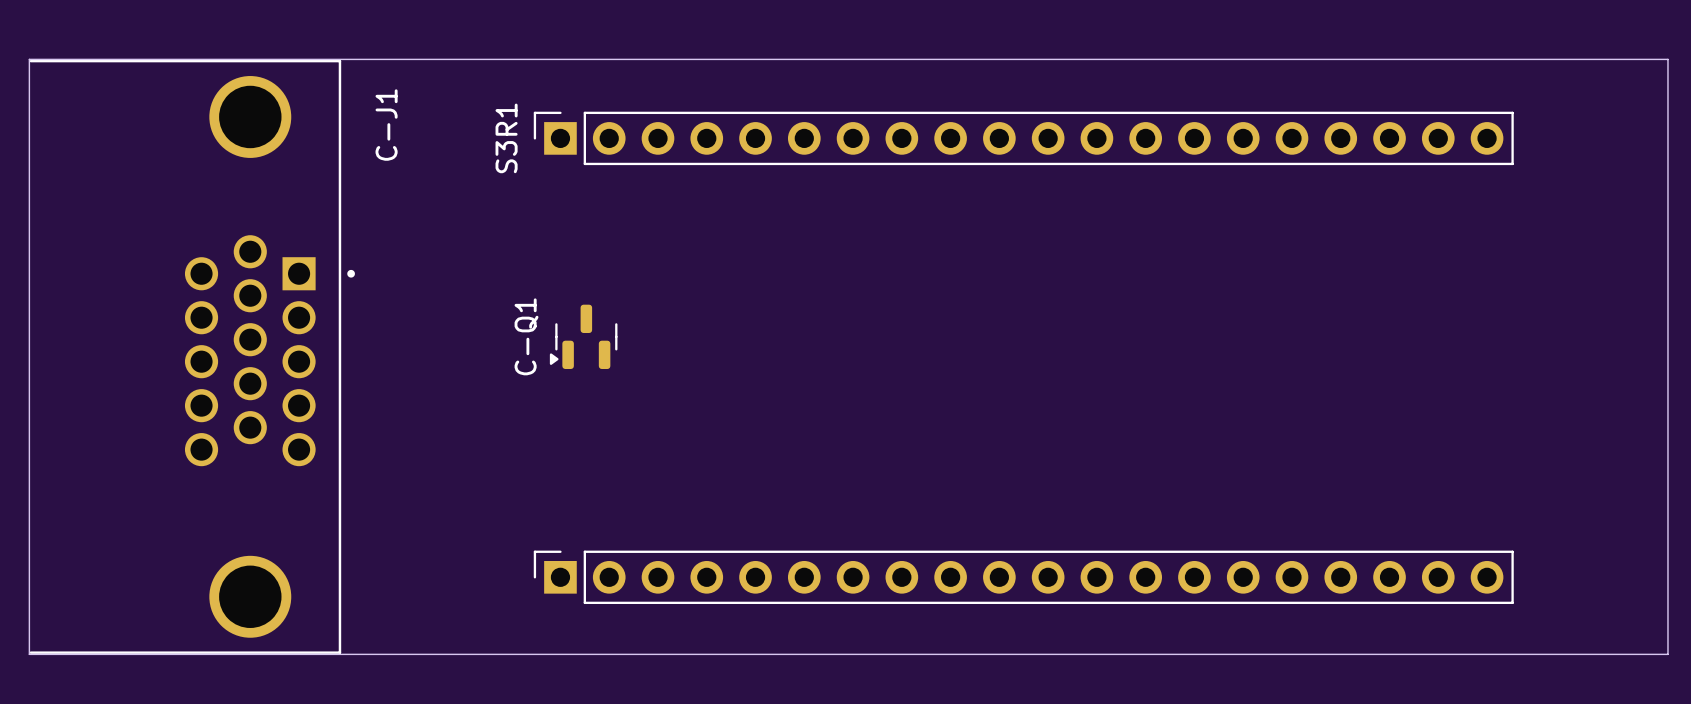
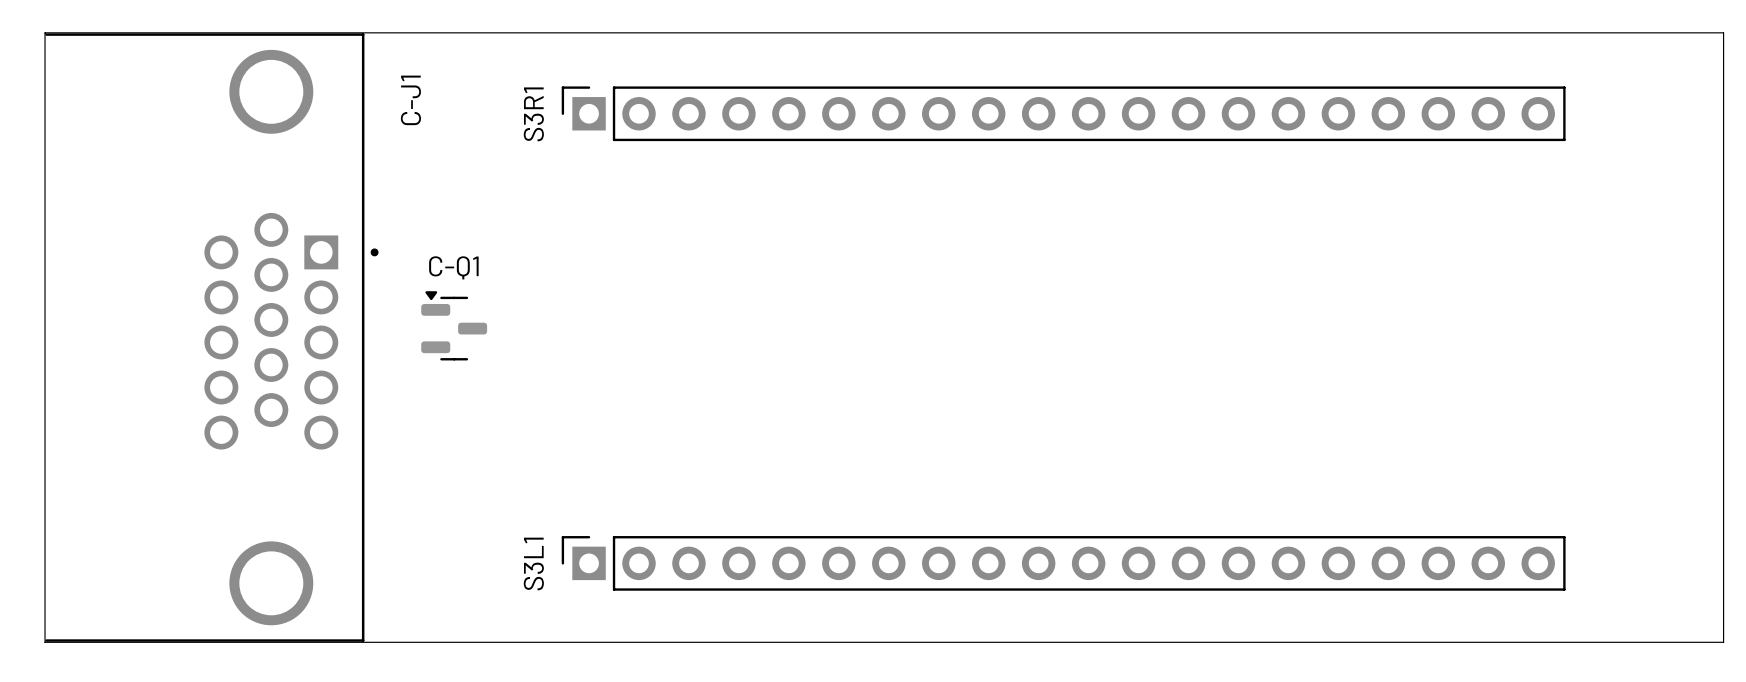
C-Q1 rotation: 0° (583, 336) -> 90° clockwise (454, 325)
C-Q1 position: (583, 336) -> (454, 325)
S3L1 name: none -> S3L1 (533, 563)

